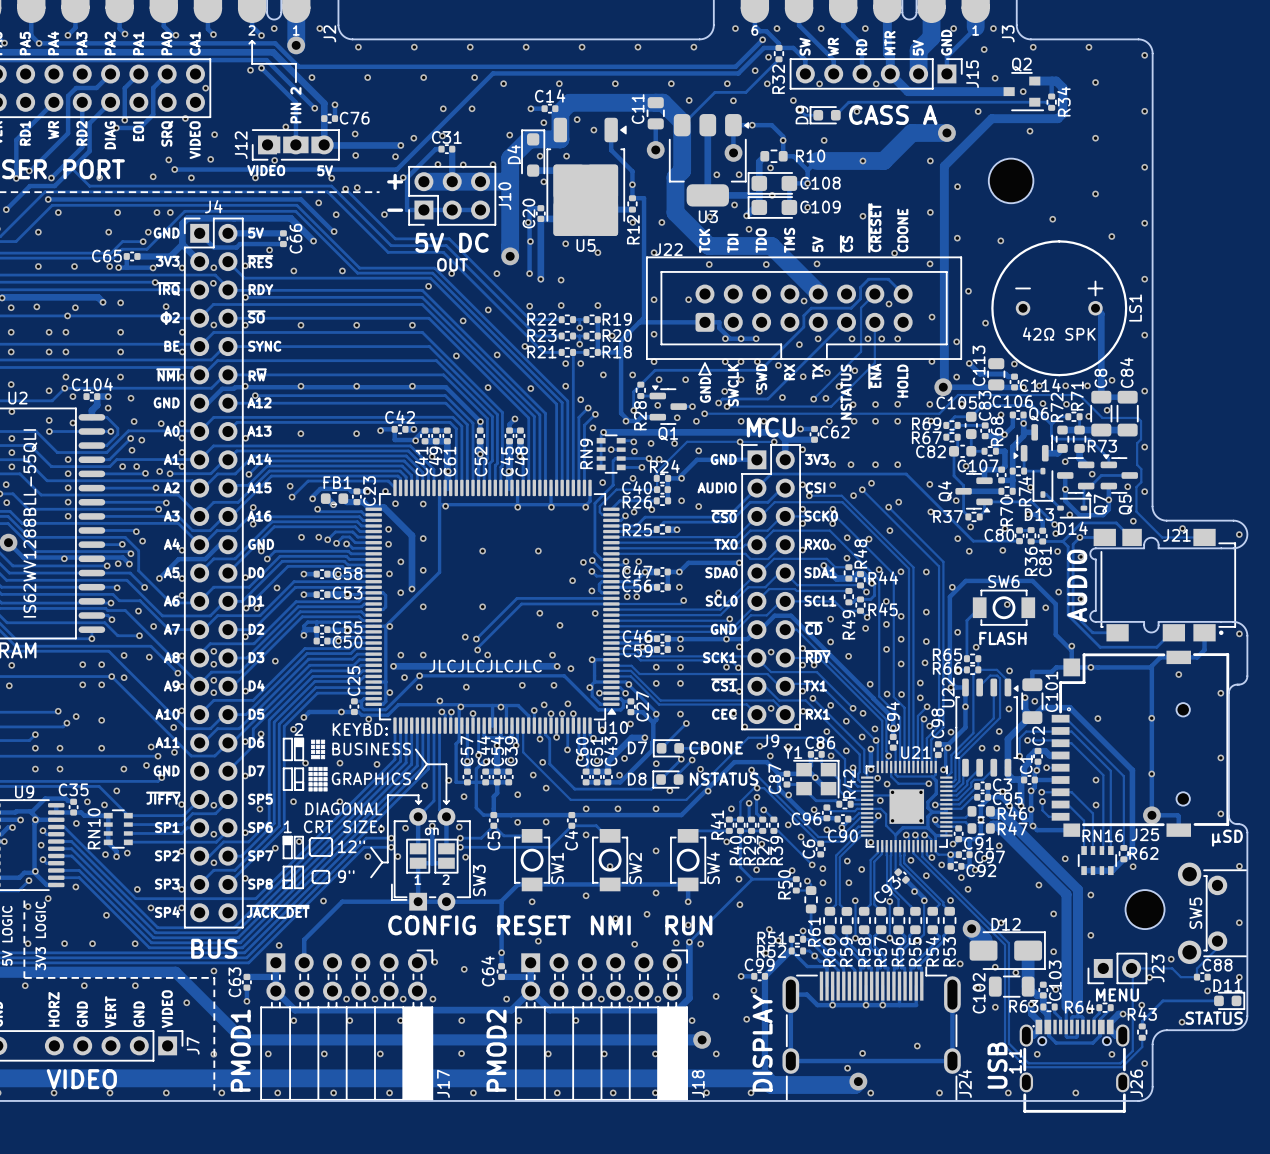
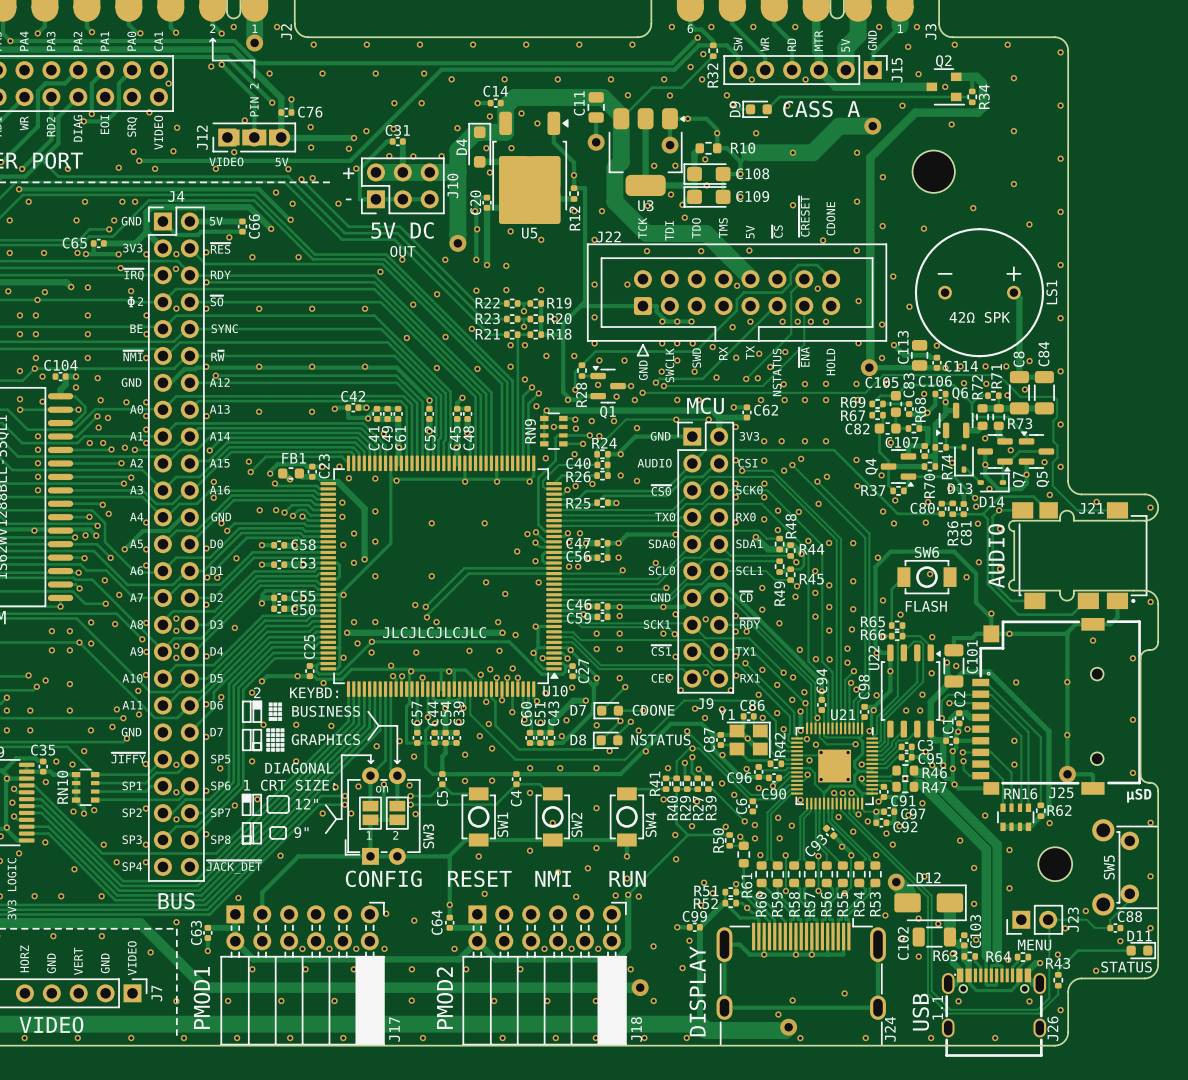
part footprint: [1125, 890, 1165, 930] -> [1038, 847, 1073, 882]

